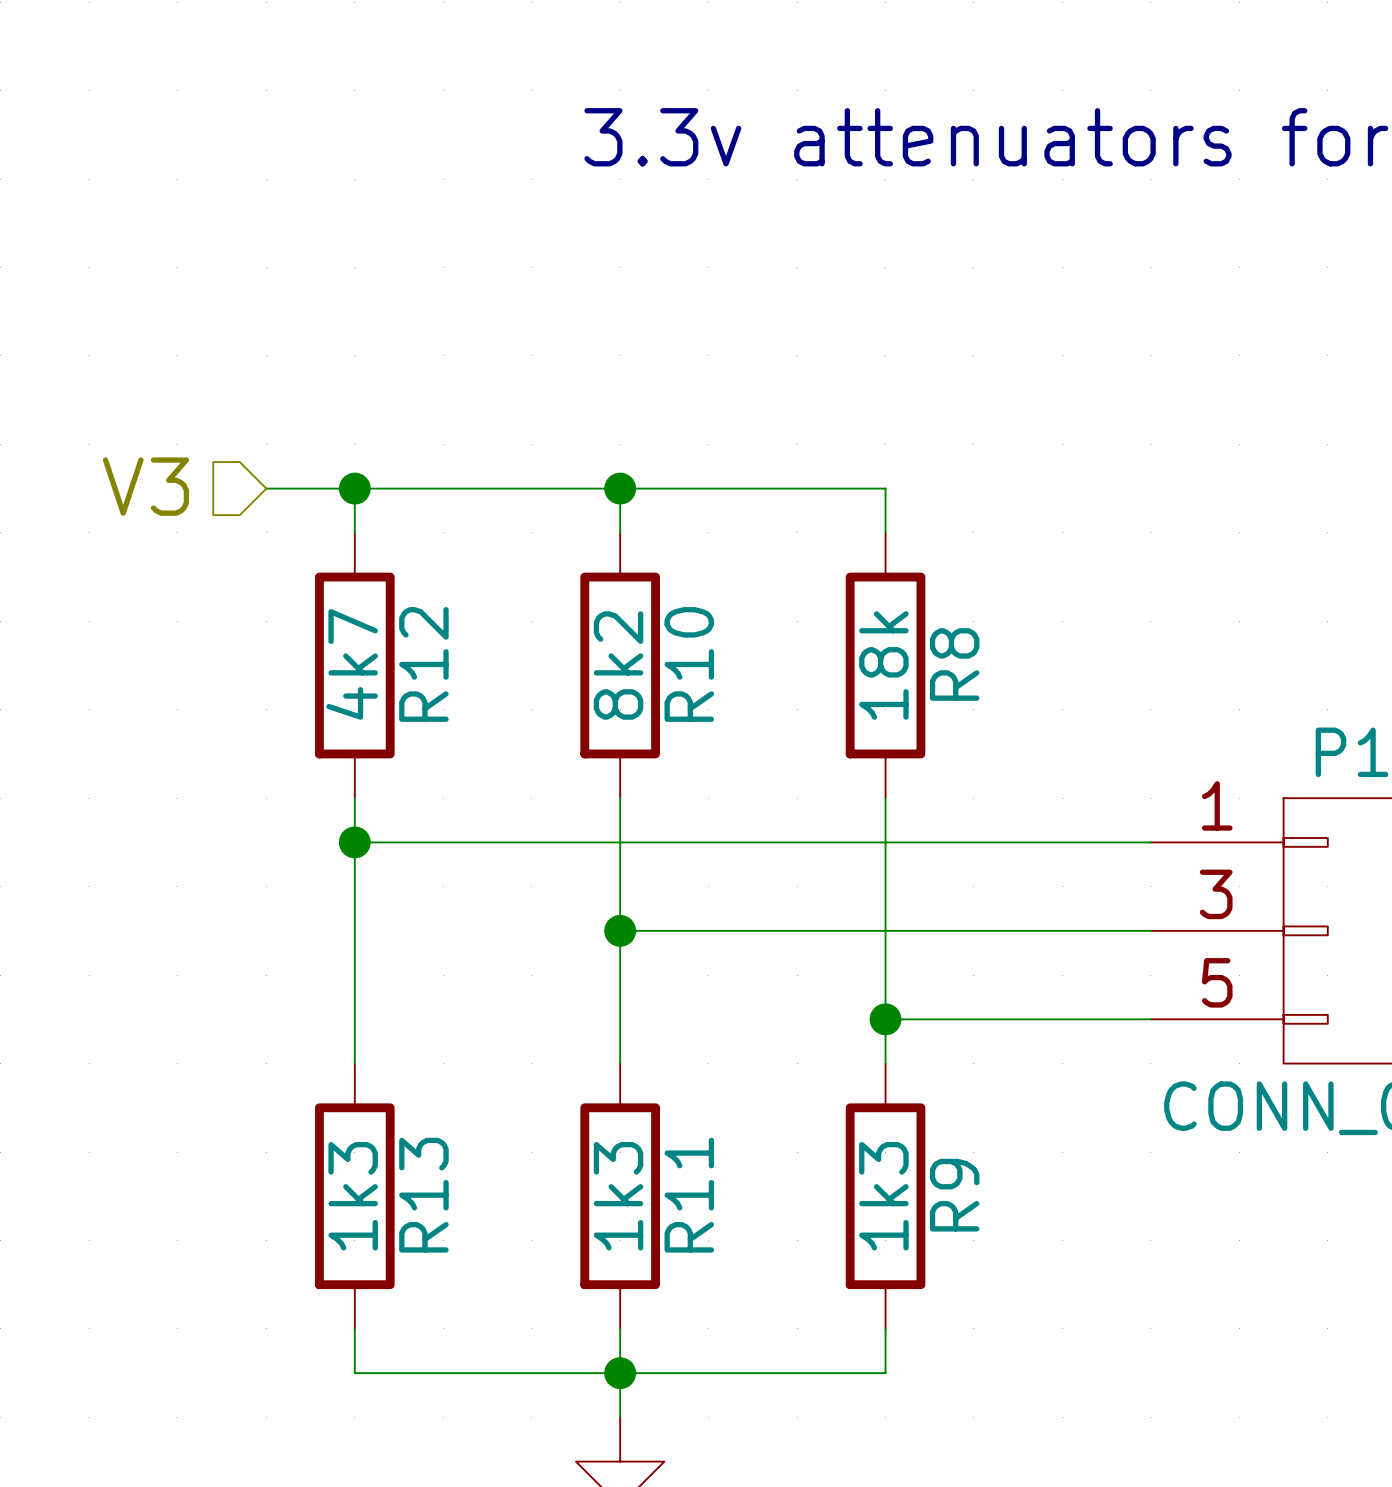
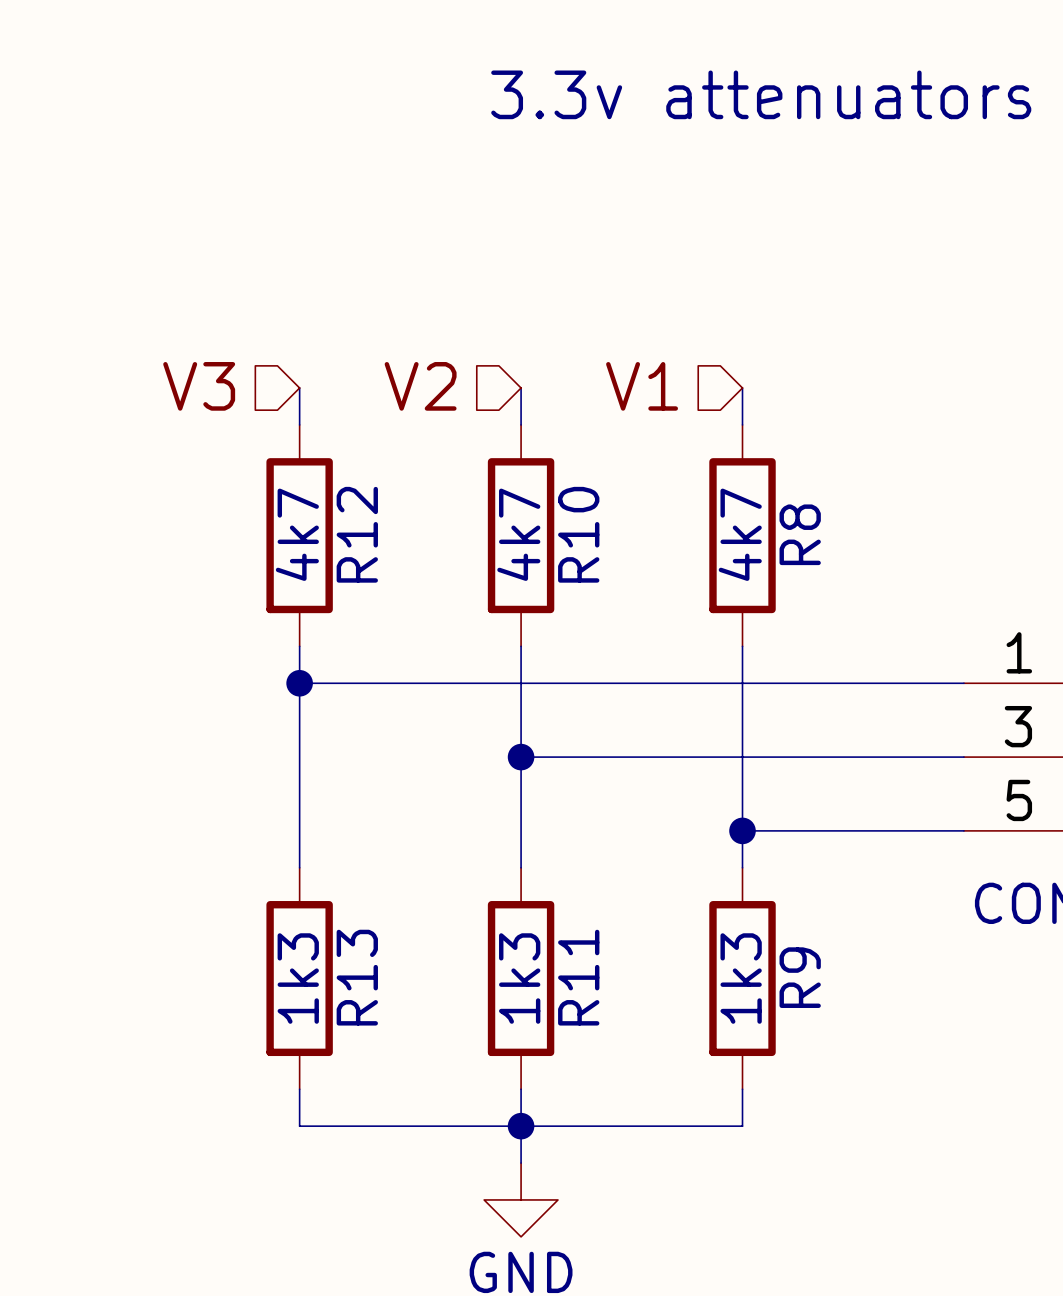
hierarchical label position: V3 (145, 486) -> V3 (199, 386)
hierarchical label: none -> V2 (420, 386)
hierarchical label: none -> V1 (642, 386)
wire: (266, 488) (885, 488) -> none
junction: (354, 488) -> none
junction: (620, 488) -> none
R10 value: 8k2 (618, 665) -> 4k7 (518, 534)
R8 value: 18k (883, 665) -> 4k7 (740, 534)

